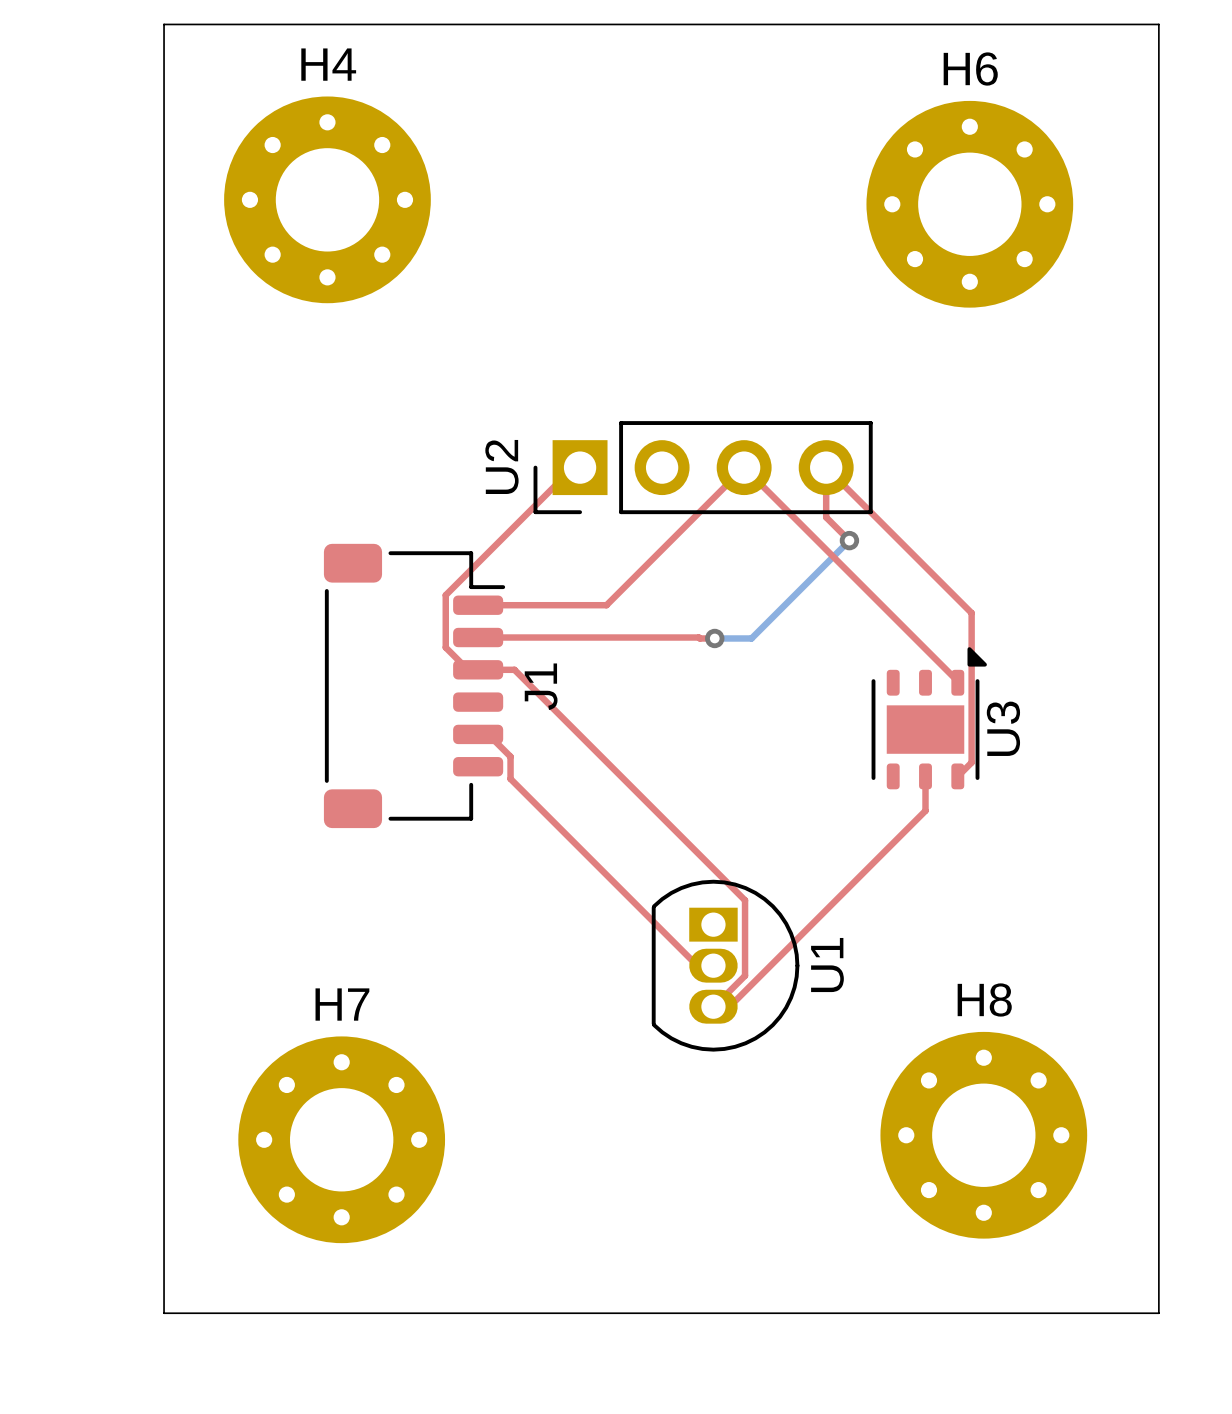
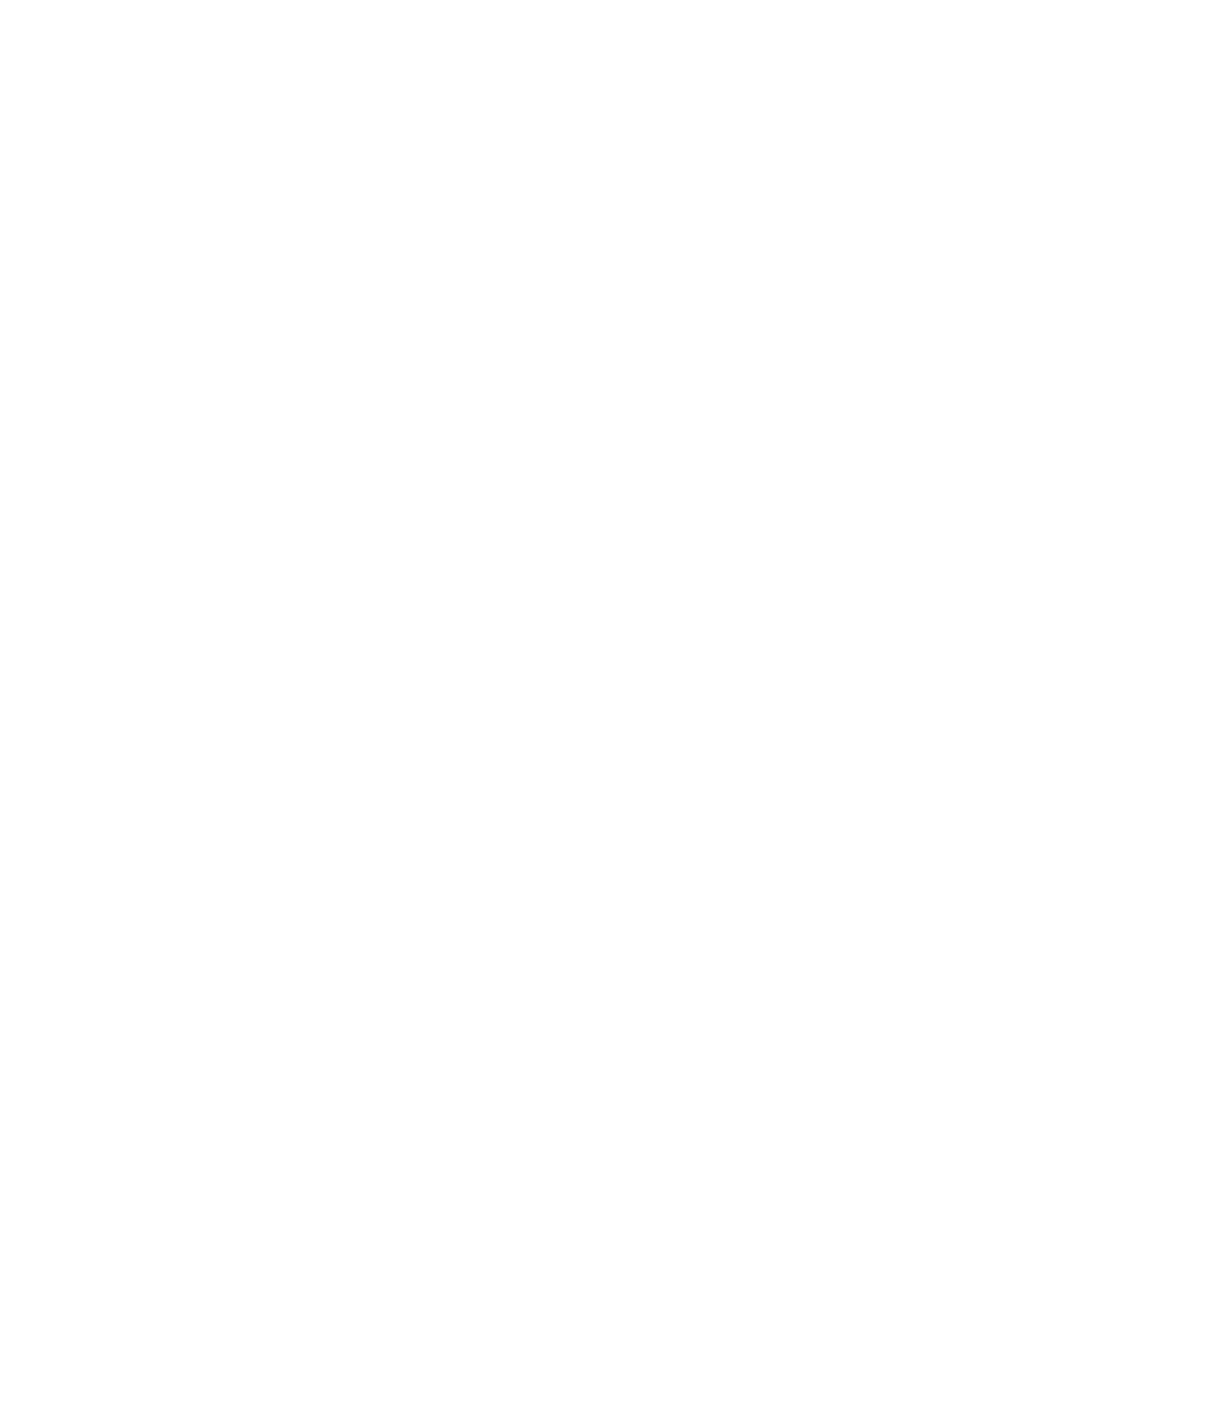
board edge: (164, 24) (1158, 24) (1158, 1313) (164, 1313) (164, 24) -> none
H4: (327, 199) -> none
H6: (969, 204) -> none
top track: (580, 467) (573, 467) (445, 595) (445, 647) (468, 669) (514, 669) (745, 900) (745, 975) (714, 1006) -> none
U2: (703, 467) -> none
top track: (849, 540) (826, 517) (826, 467) (971, 613) (971, 762) (957, 776) -> none
bottom track: (849, 540) (751, 638) (714, 638) -> none
via: (849, 540) -> none
top track: (478, 605) (606, 605) (744, 467) (957, 682) -> none
top track: (478, 637) (714, 638) -> none
via: (714, 638) -> none
J1: (414, 685) -> none
U3: (929, 718) -> none
top track: (478, 734) (488, 734) (510, 756) (510, 778) (697, 965) (713, 965) -> none
top track: (925, 776) (925, 810) (729, 1006) (713, 1006) -> none
U1: (725, 965) -> none
H8: (983, 1135) -> none
H7: (341, 1139) -> none

